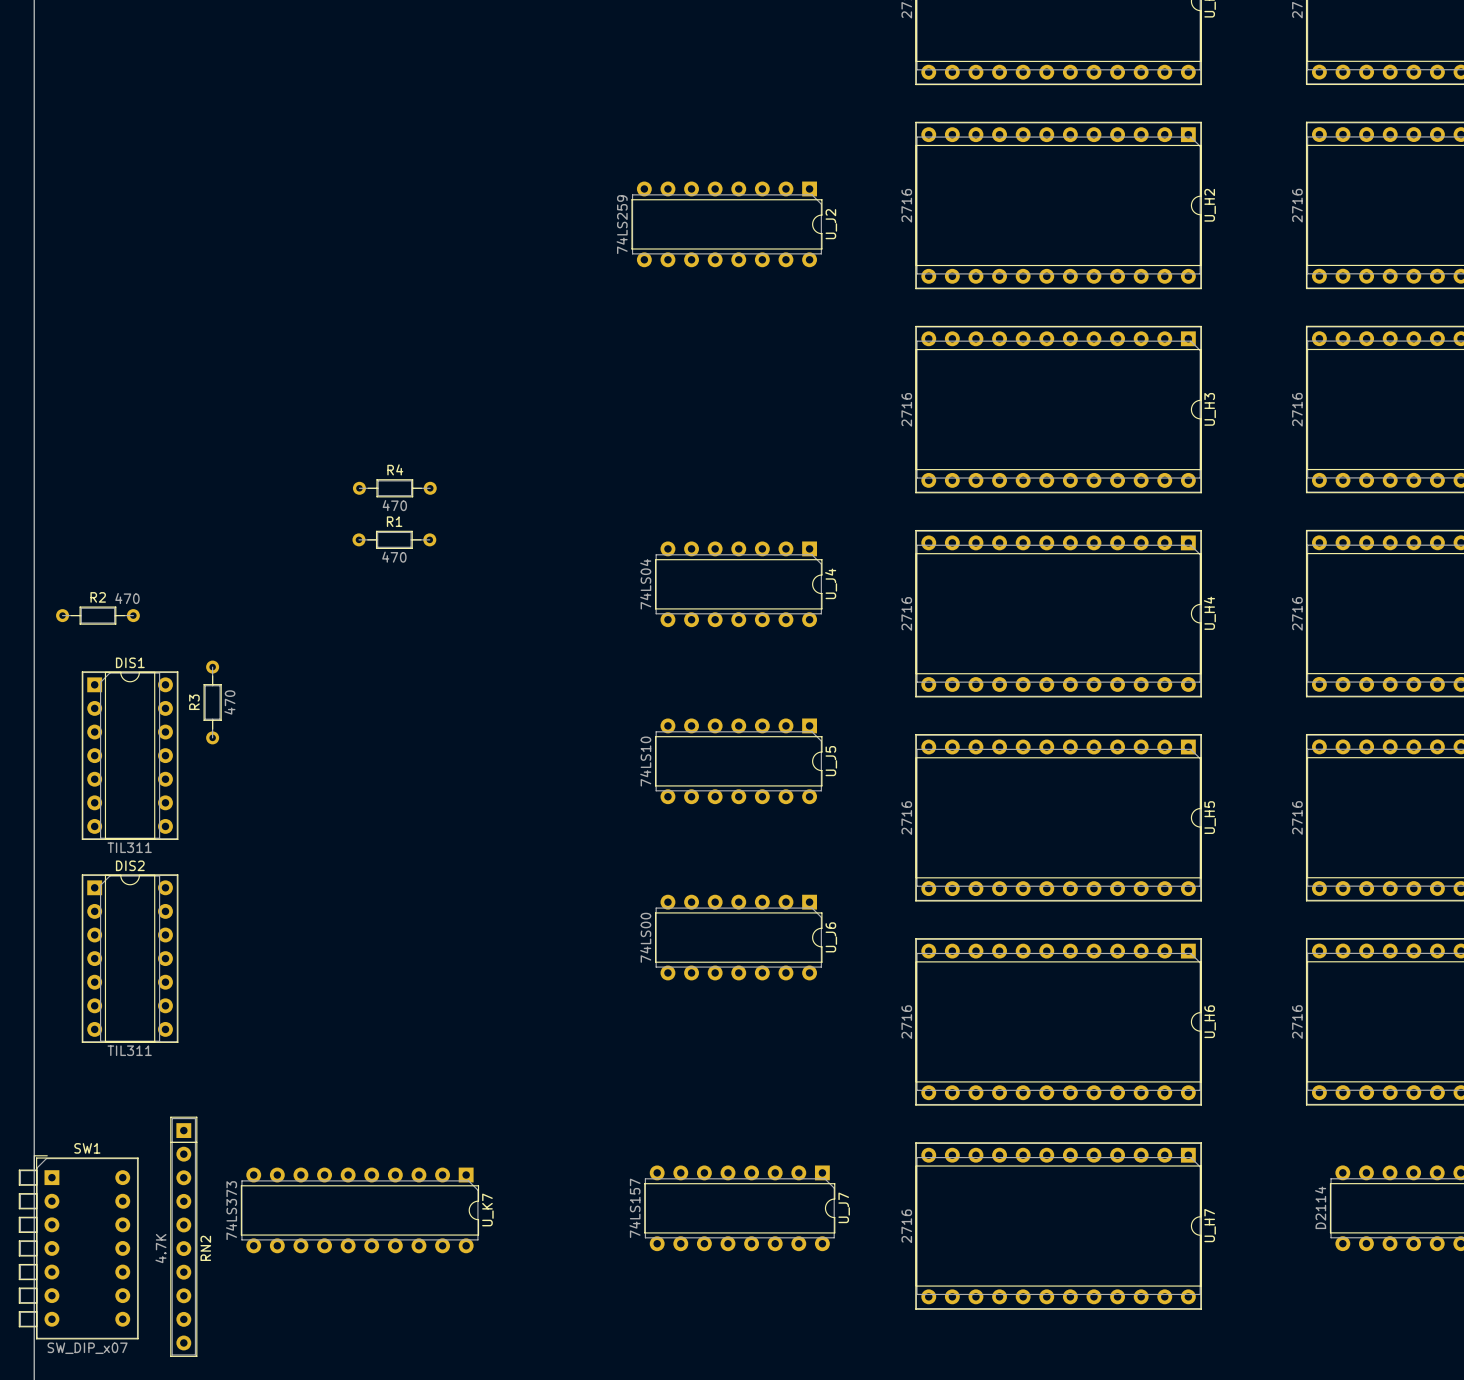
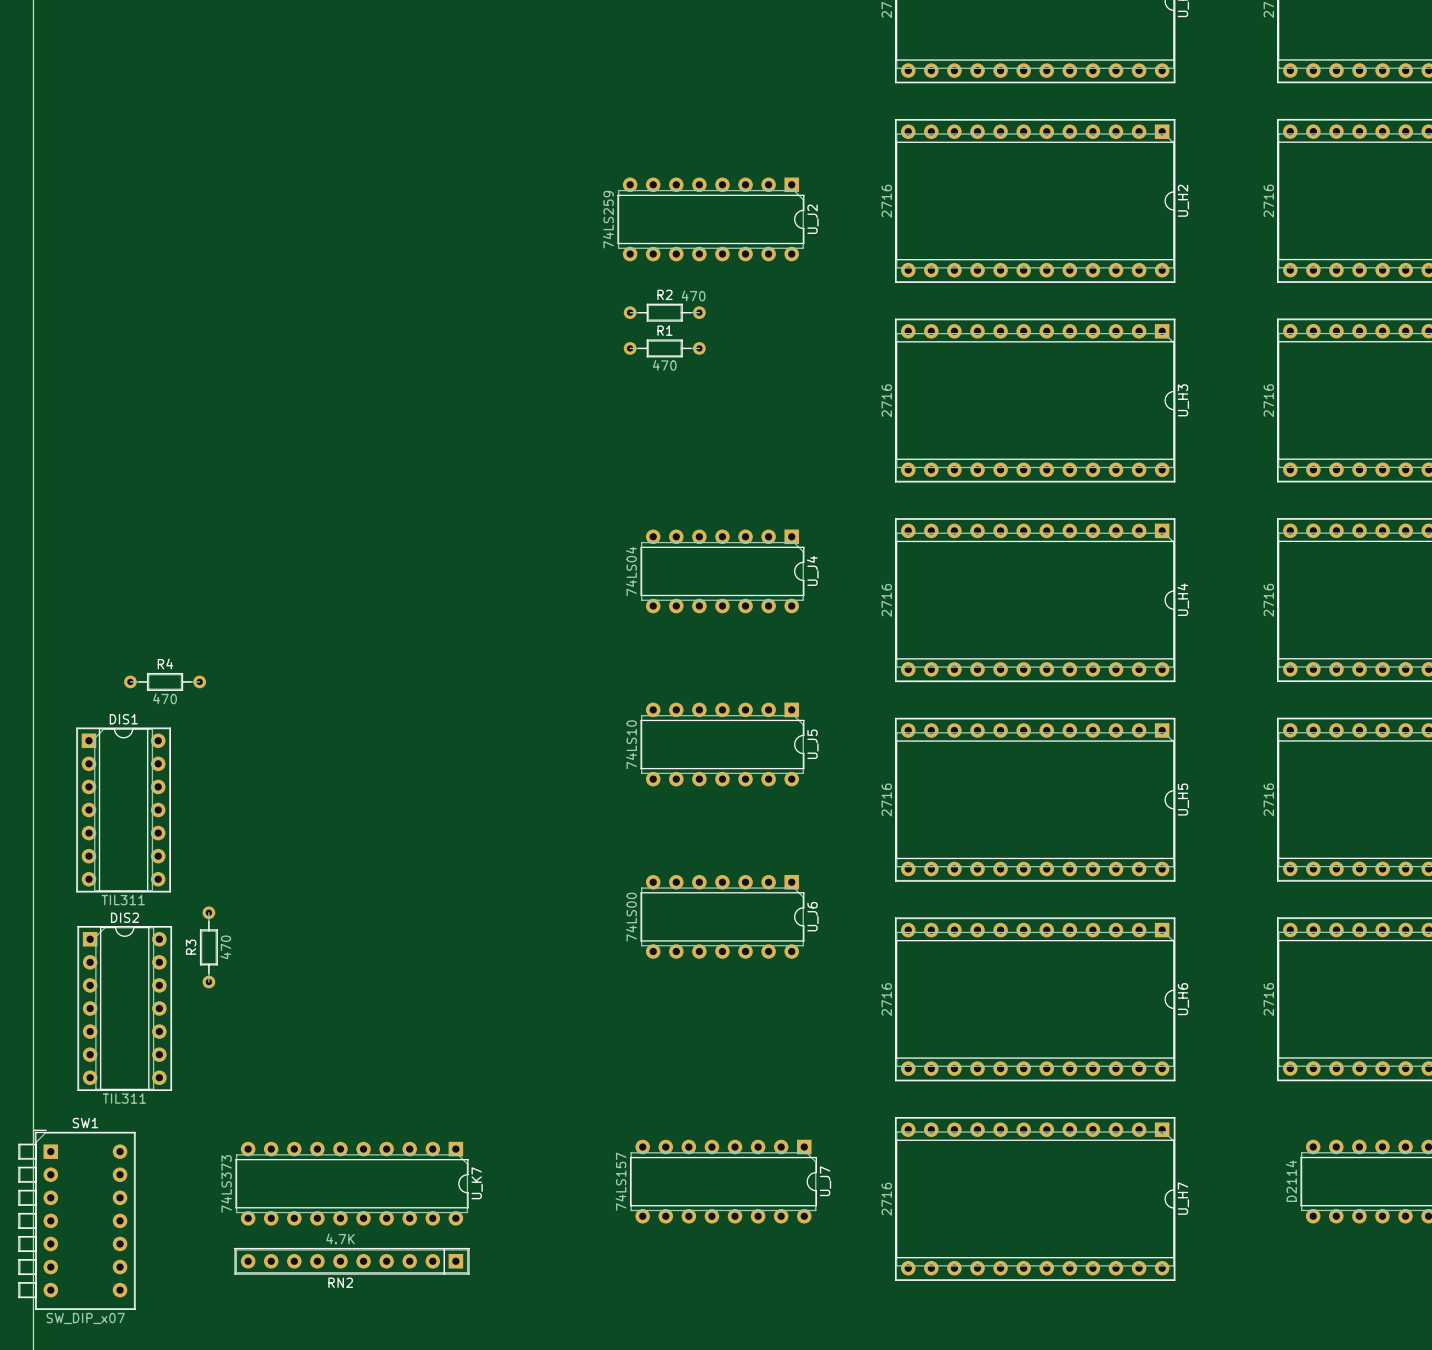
R4 position: (394, 488) -> (165, 681)
R1 position: (394, 539) -> (664, 348)
R2 position: (97, 615) -> (664, 312)
R3 position: (212, 702) -> (208, 947)
DIS1 position: (130, 755) -> (123, 810)
DIS2 position: (130, 958) -> (124, 1008)
RN2 rotation: 0° (183, 1236) -> 90° clockwise (352, 1261)
RN2 position: (183, 1236) -> (352, 1261)

